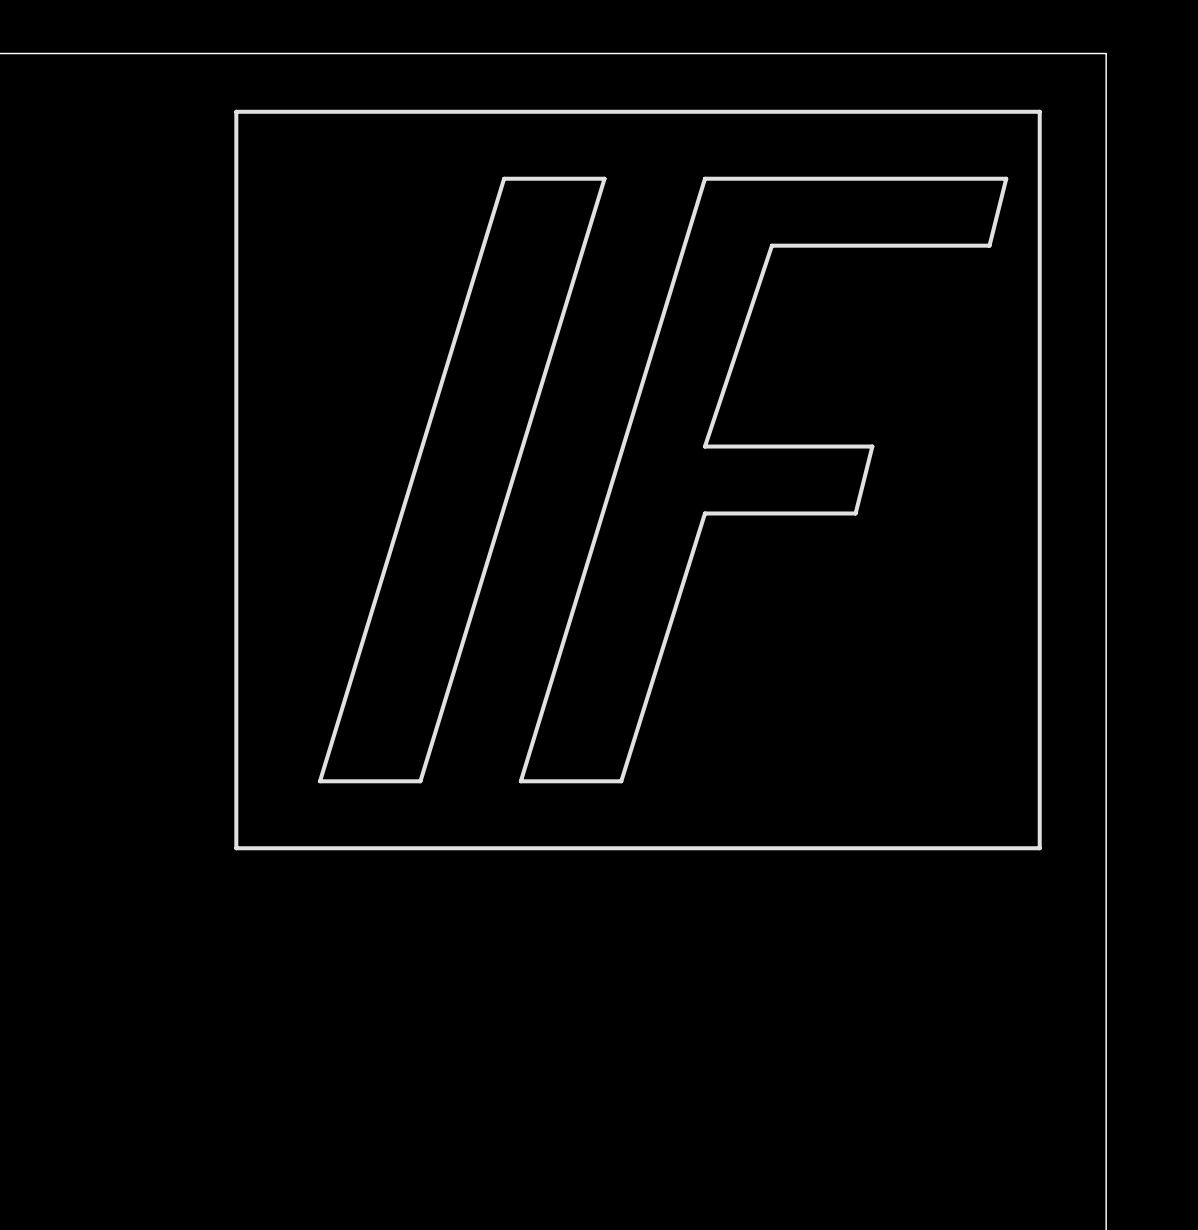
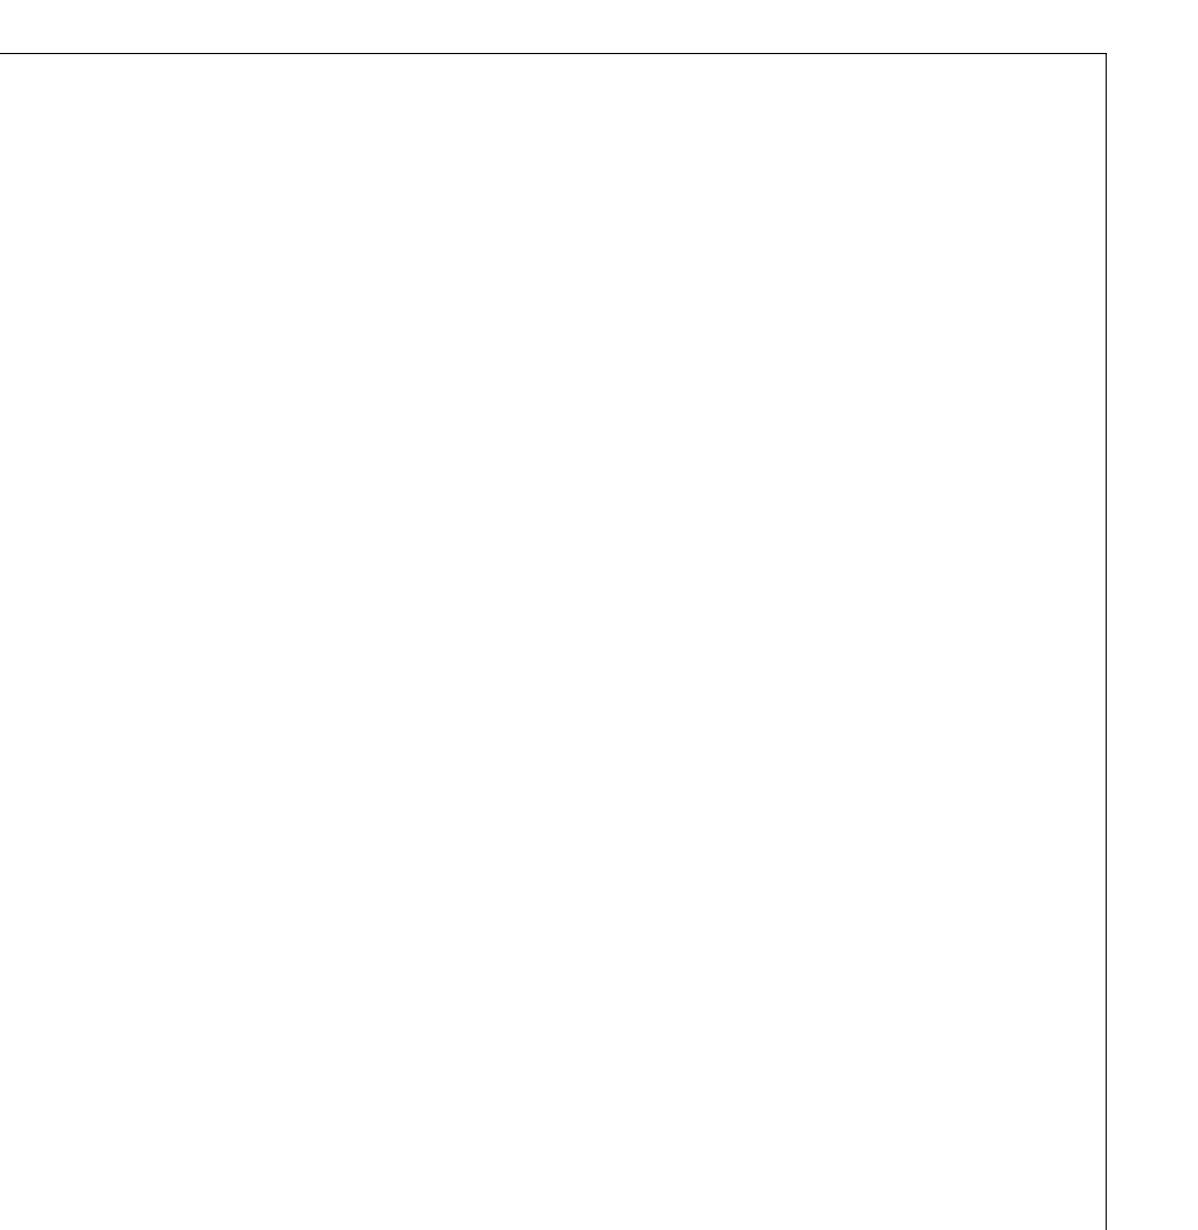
line: (236, 111) (1039, 111) (1039, 848) (236, 848) (236, 111) -> none
line: (504, 178) (320, 781) (420, 781) (604, 178) (504, 178) -> none
line: (704, 178) (1006, 178) (989, 245) (771, 245) (704, 446) (872, 446) (855, 513) (704, 513) (621, 781) (520, 781) (704, 178) -> none

